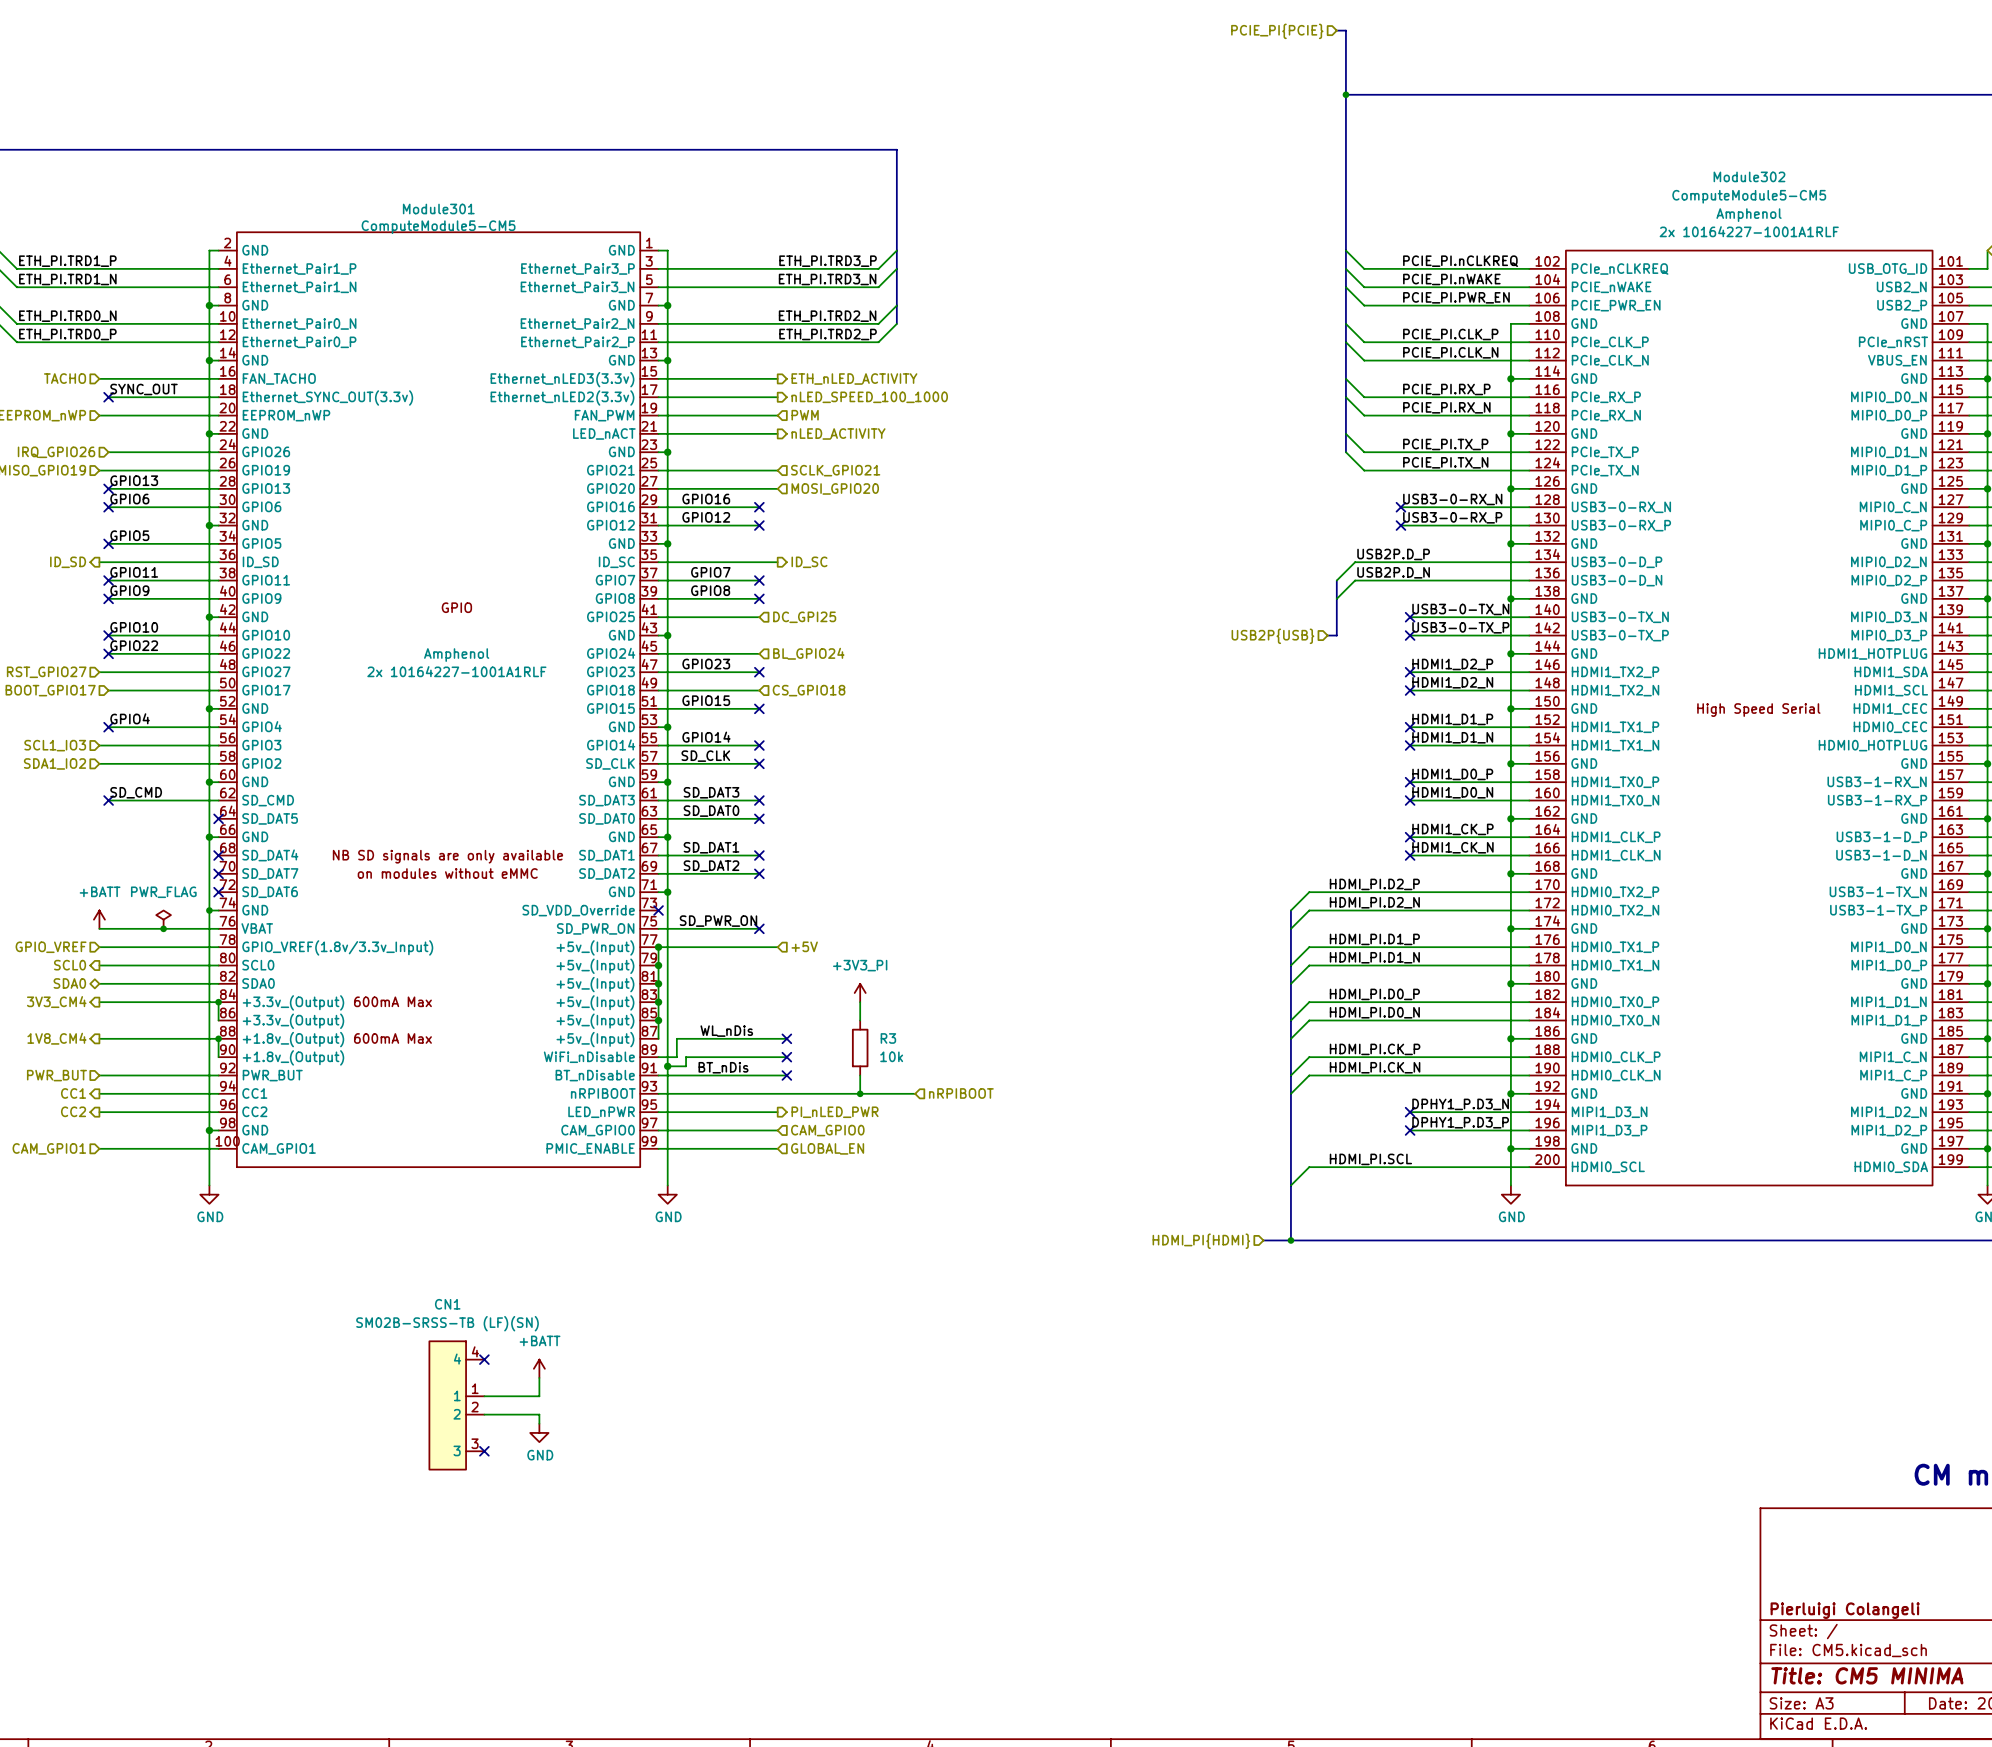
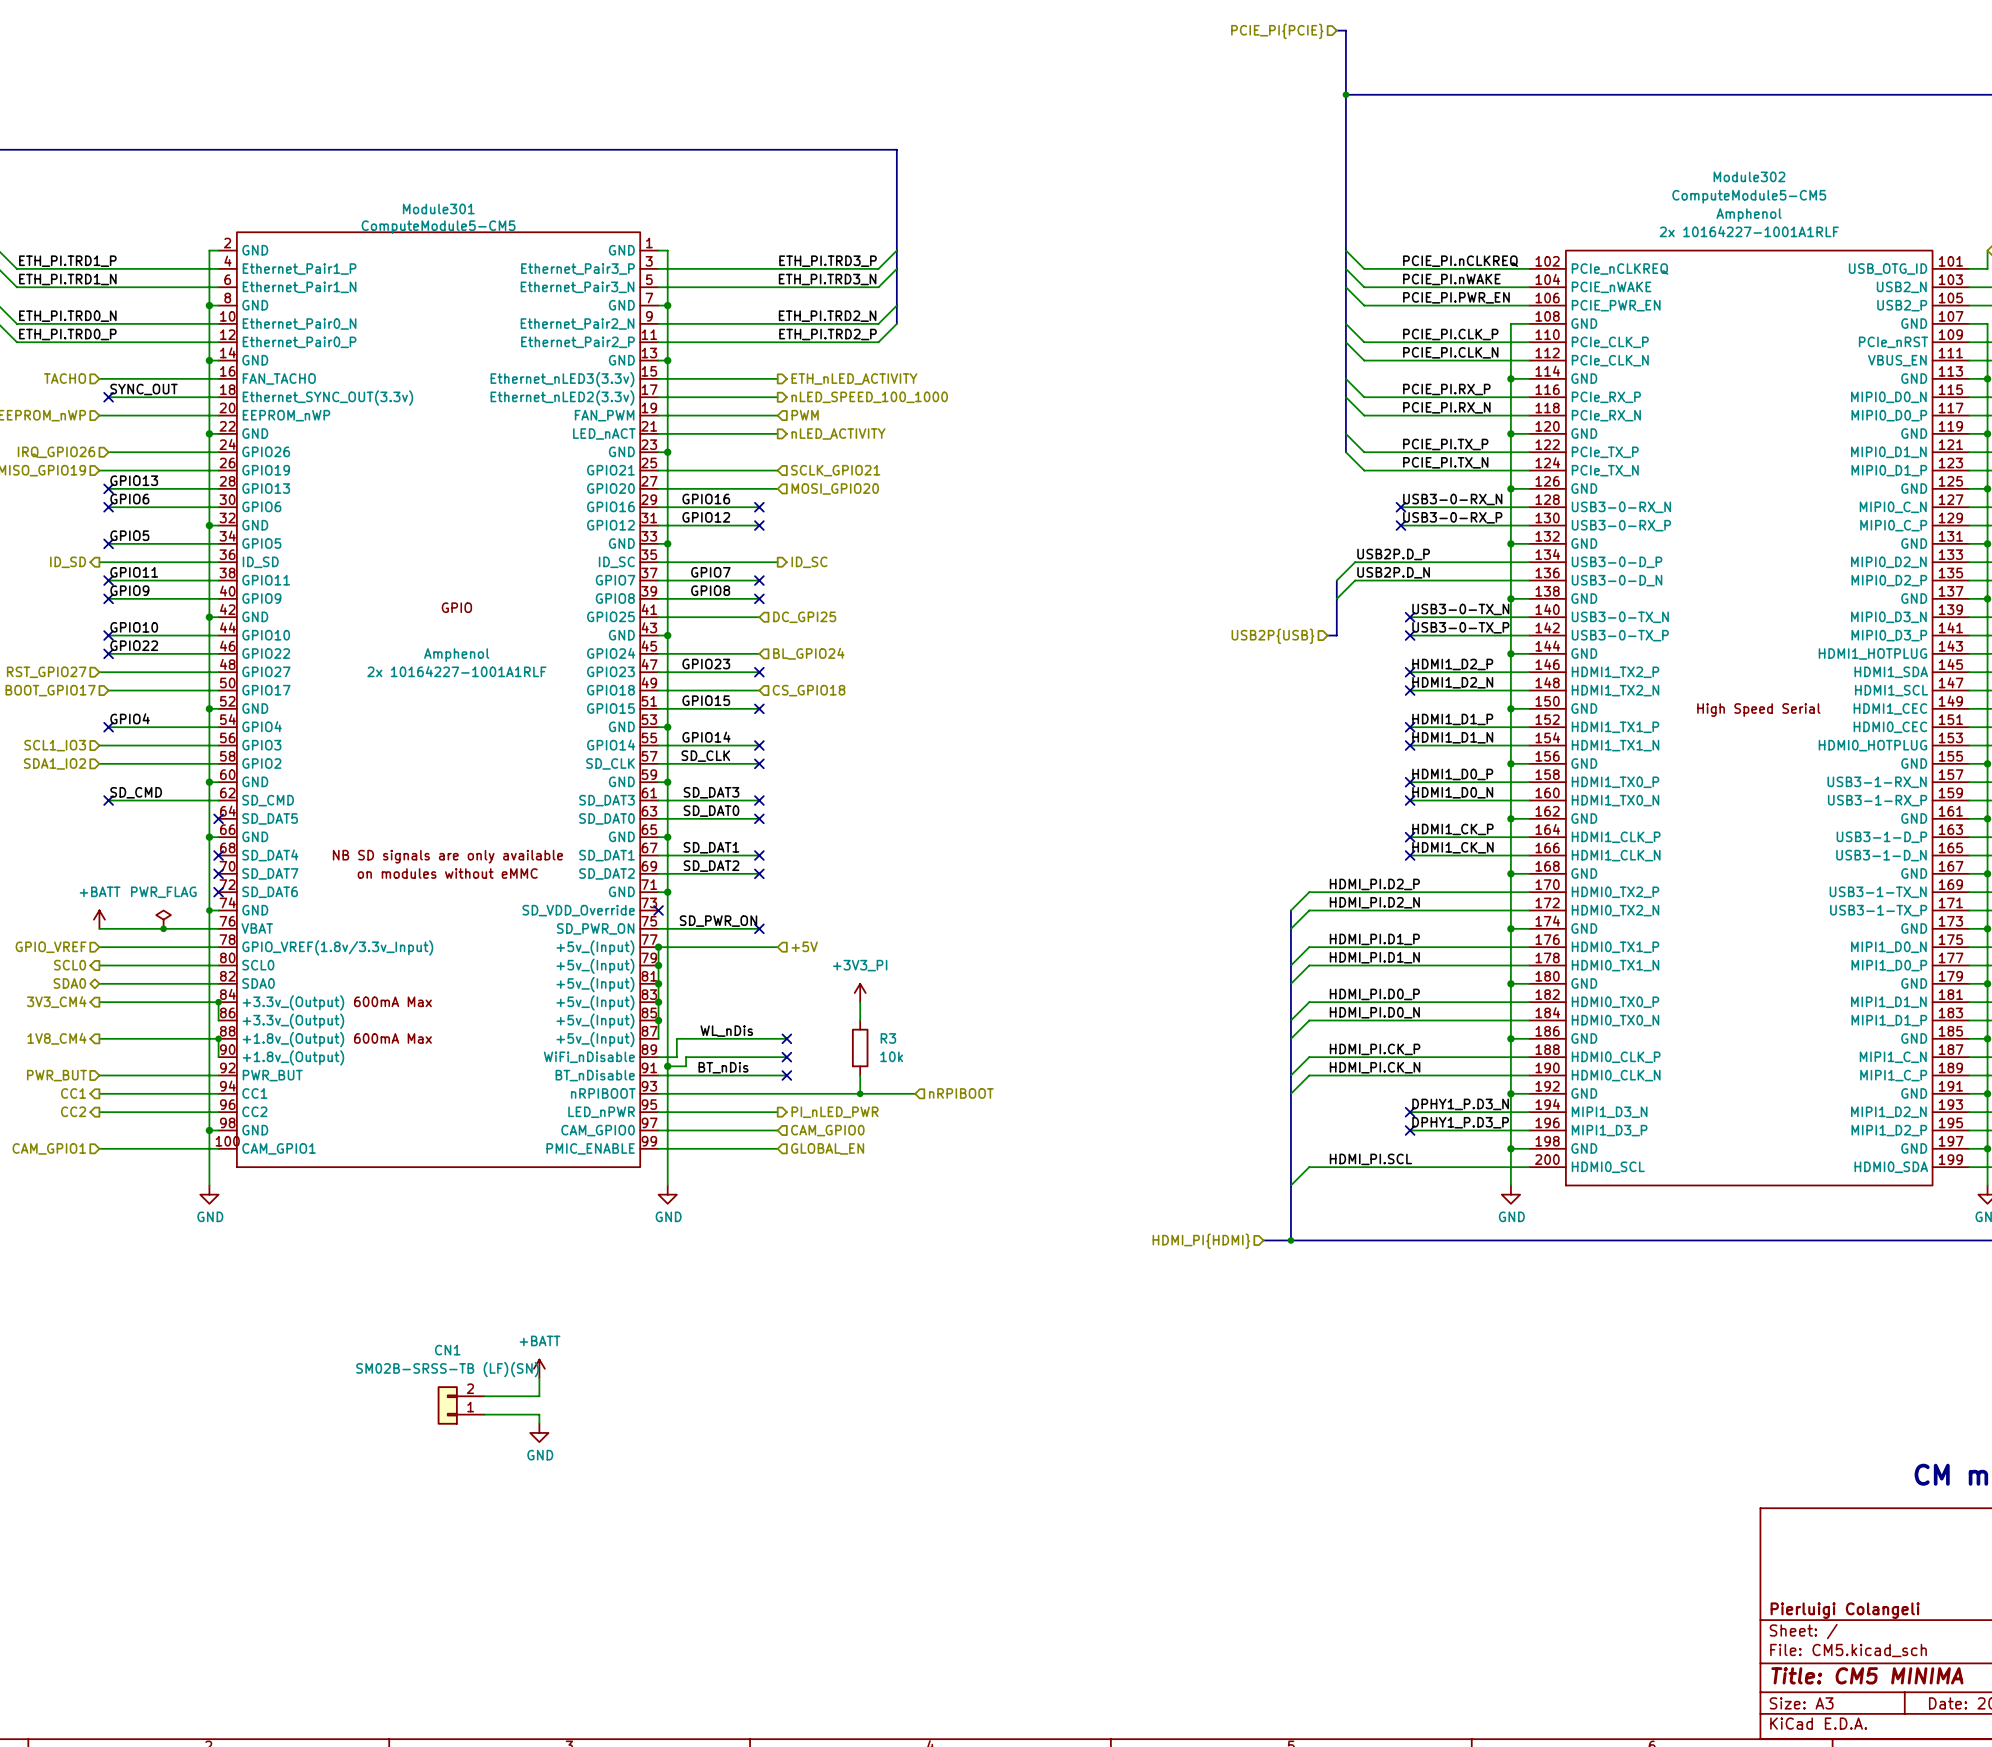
CN1 name position: CN1 (447, 1304) -> CN1 (447, 1350)
CN1 value position: SM02B-SRSS-TB (LF)(SN) (447, 1323) -> SM02B-SRSS-TB (LF)(SN) (447, 1369)
CN1 symbol: [429, 1341, 485, 1470] -> [437, 1386, 485, 1425]
no-connect mark: (484, 1359) -> none
no-connect mark: (484, 1451) -> none

